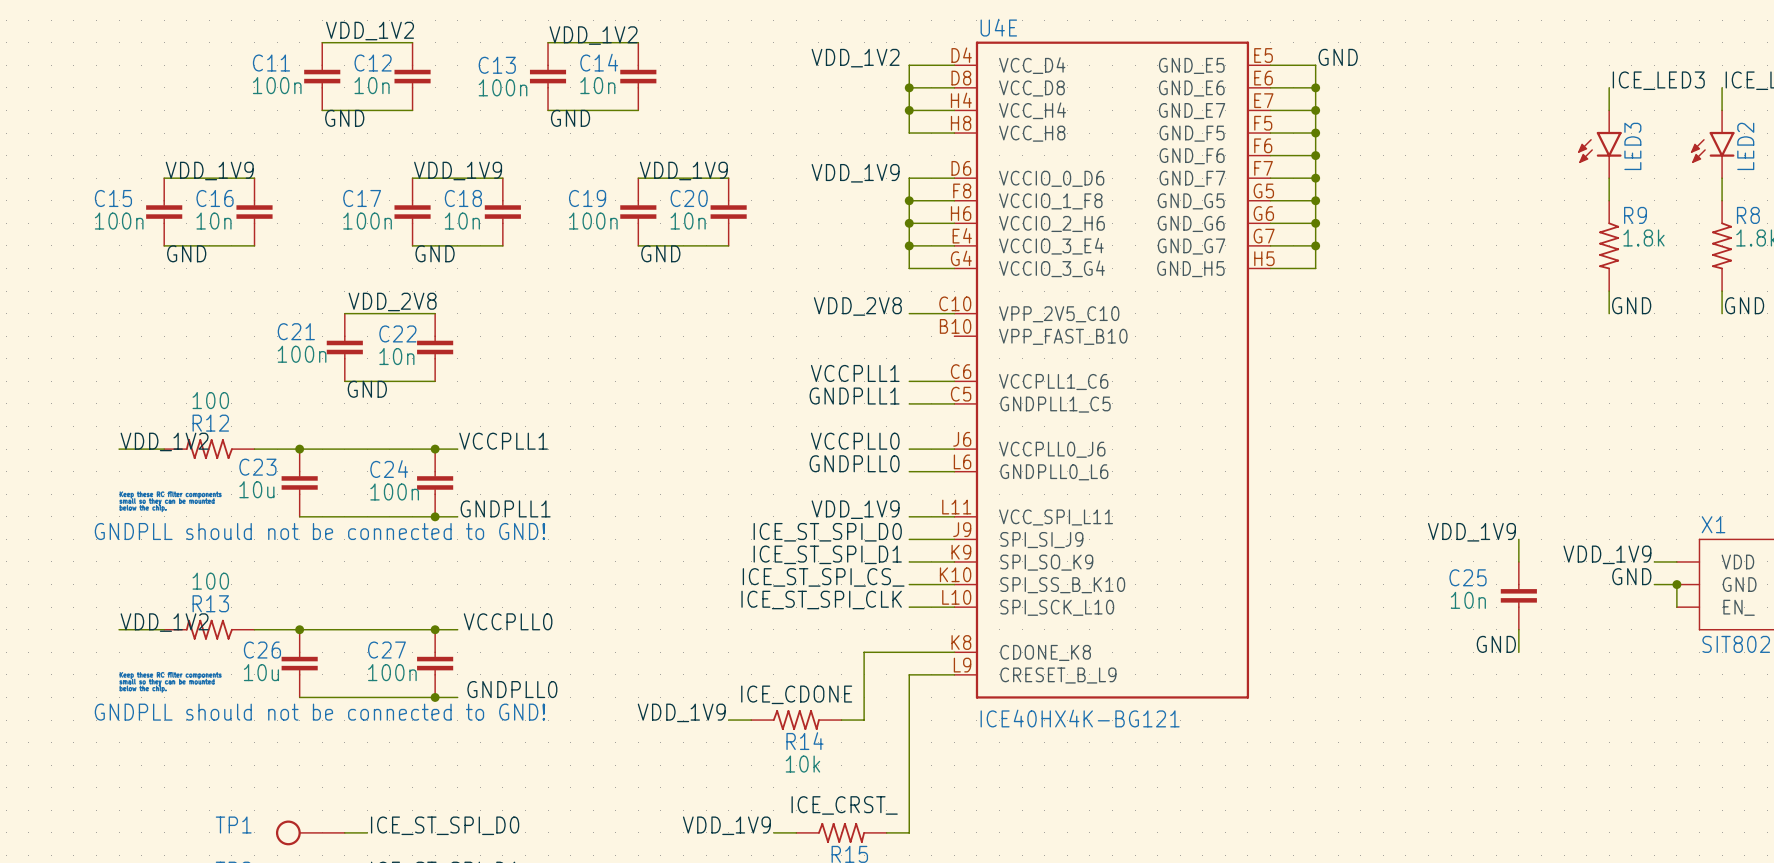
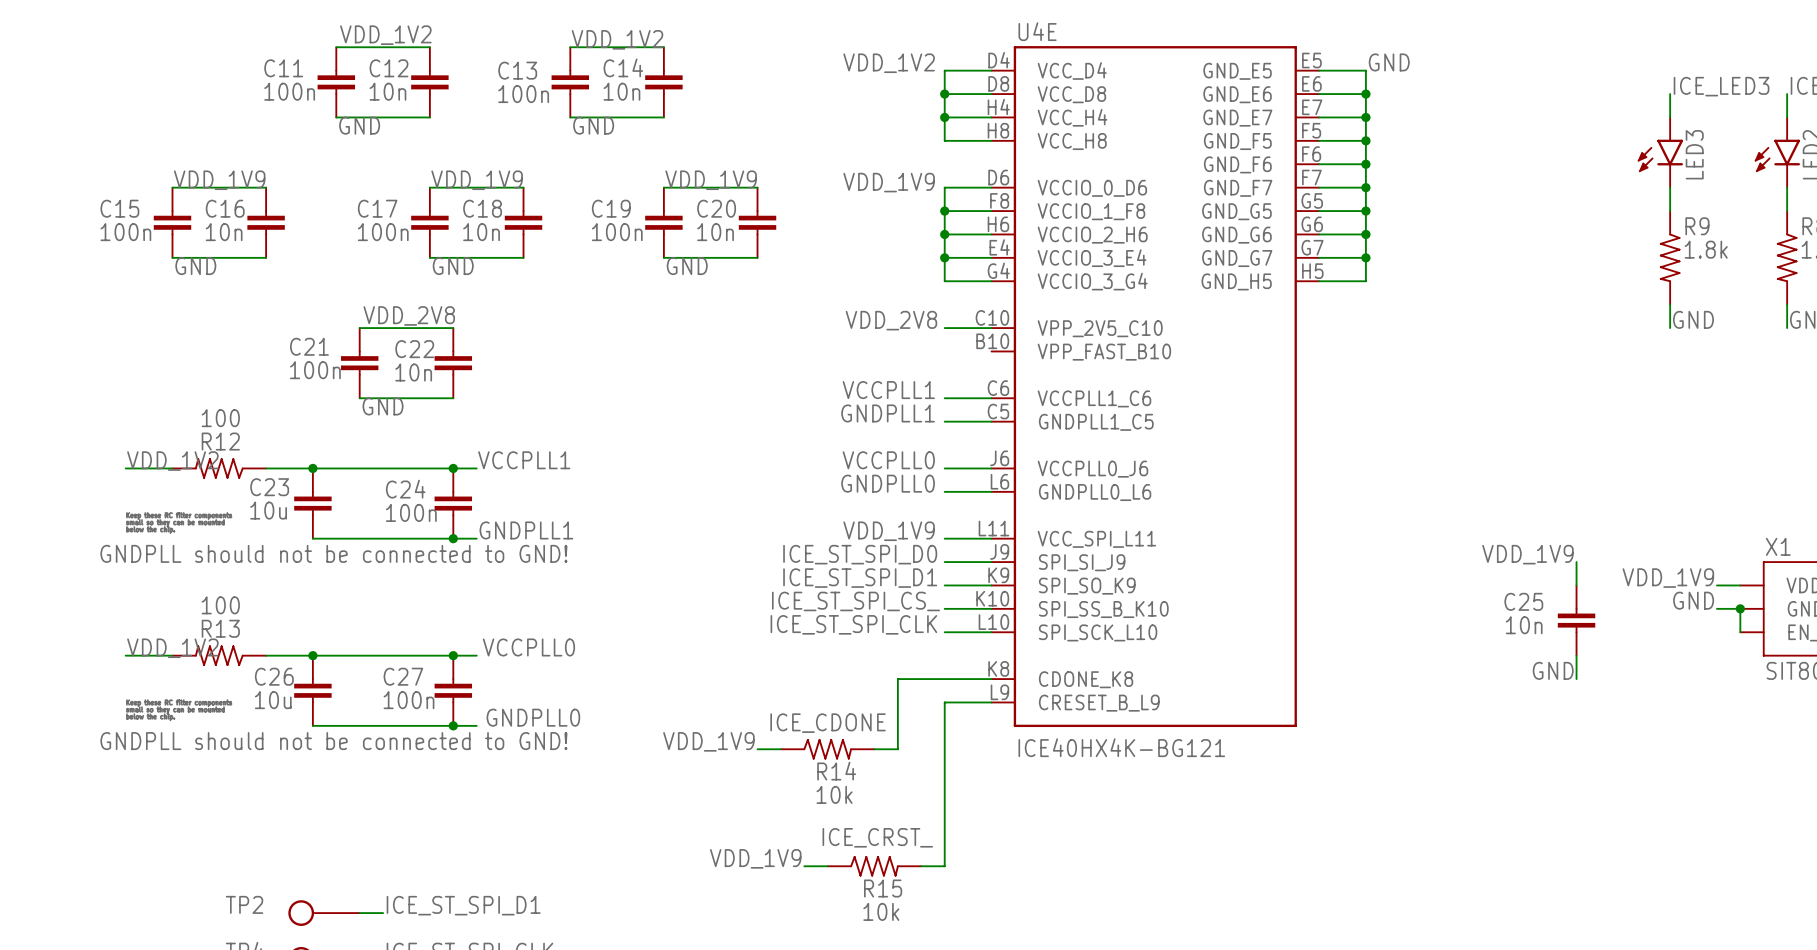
label: ICE_ST_SPI_D0 (445, 825) -> none
TP1: (310, 832) -> none
wire: (344, 832) (367, 832) -> none

